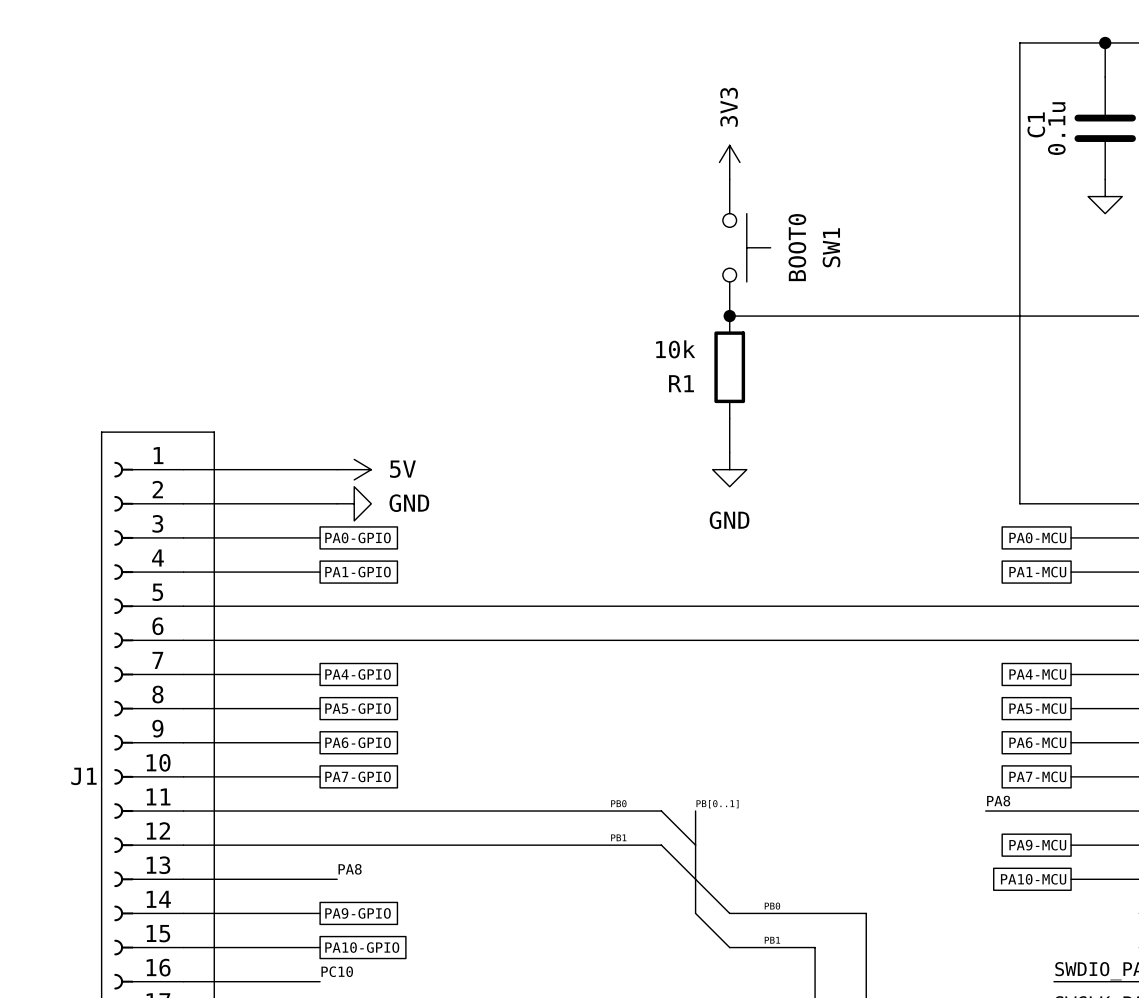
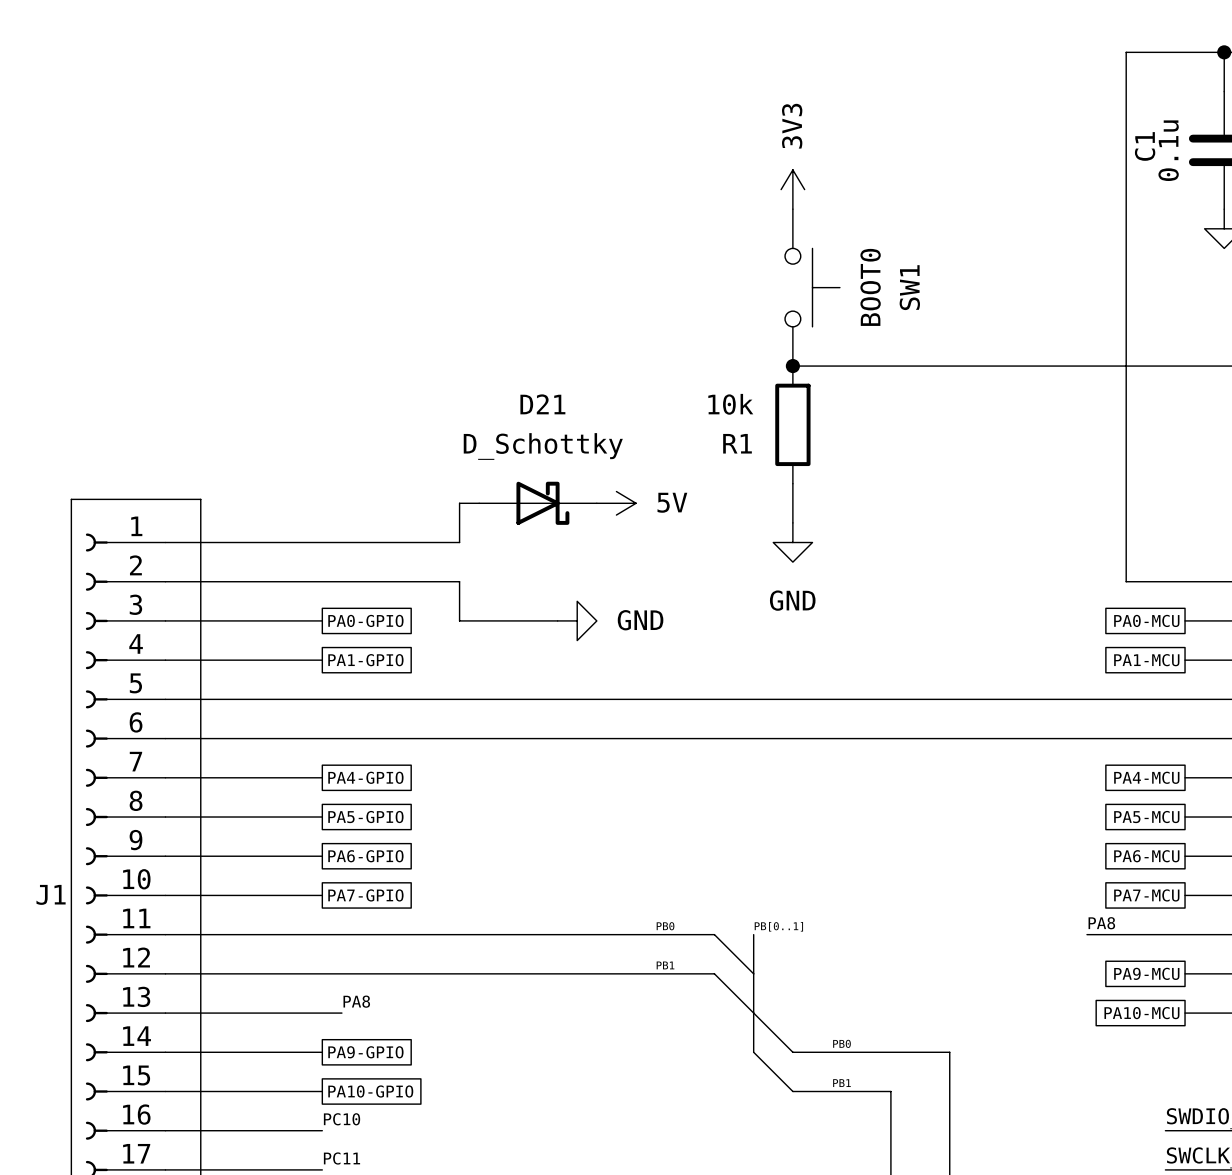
wire: none -> (479, 503) (459, 503) (459, 542) (341, 542)
D21: none -> D_Schottky (538, 503)
power symbol position: 5V (354, 469) -> 5V (616, 503)
wire: none -> (341, 581) (459, 581) (459, 620) (557, 620)
power symbol position: GND (354, 503) -> GND (577, 620)

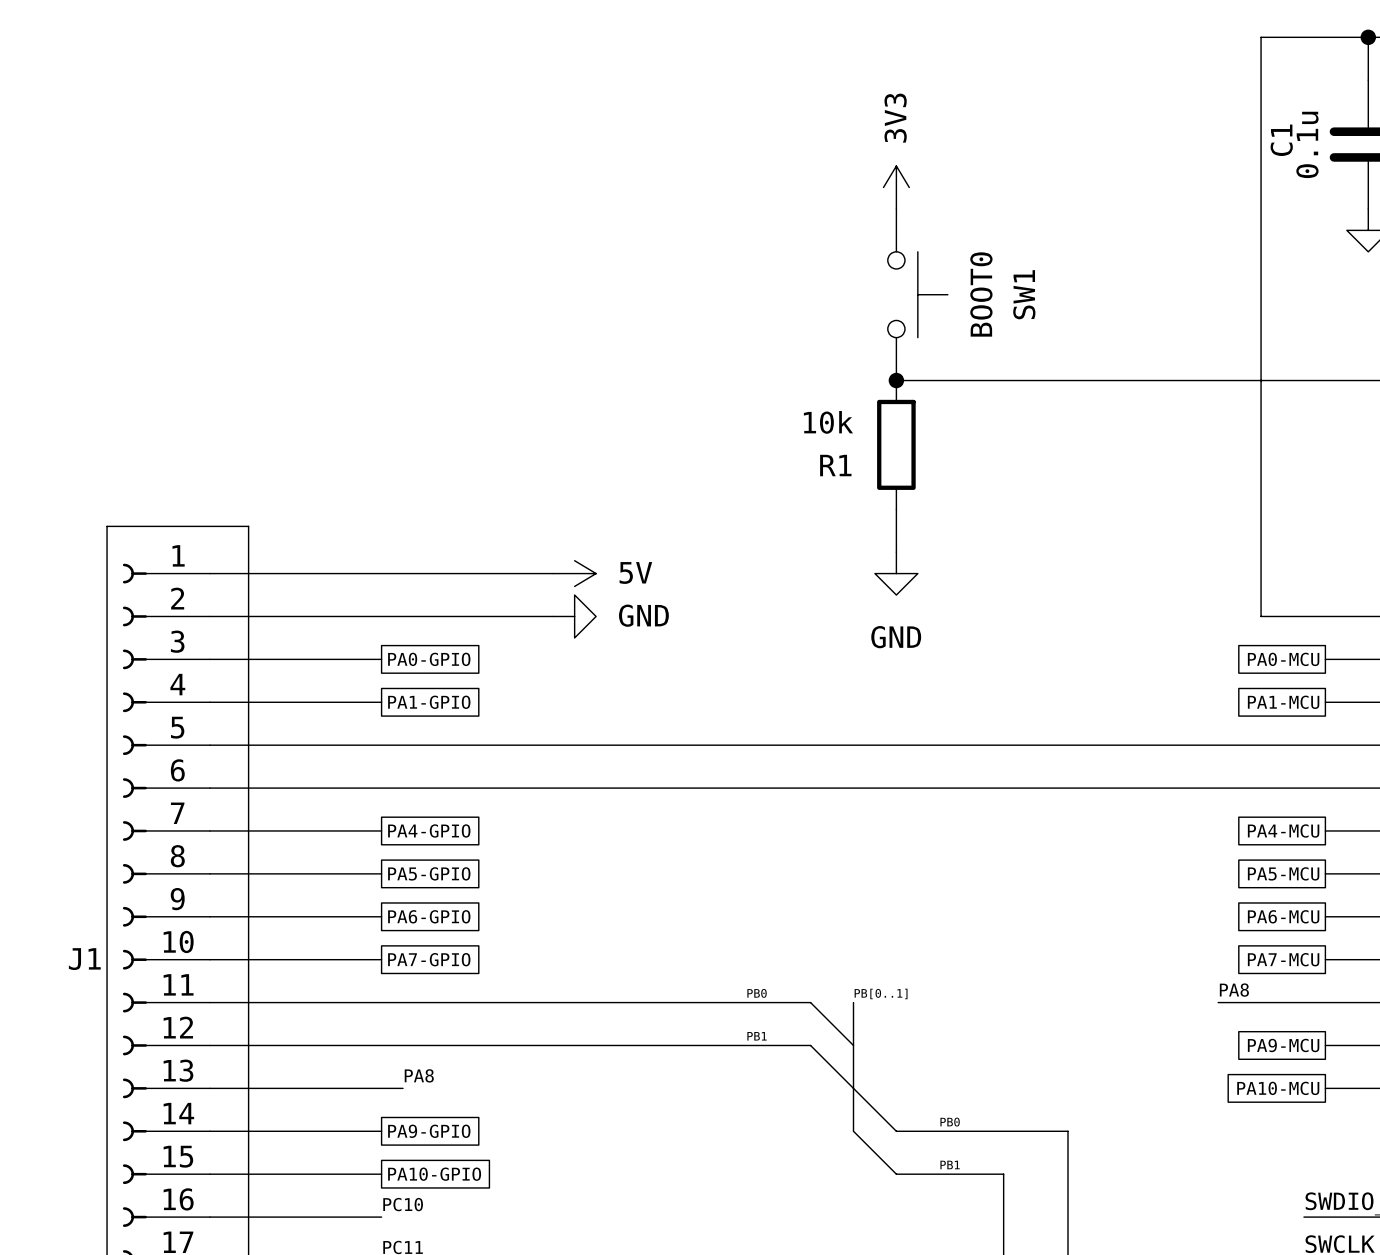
wire: (479, 503) (459, 503) (459, 542) -> (553, 573) (531, 573)
D21: D_Schottky (538, 503) -> none
power symbol position: 5V (616, 503) -> 5V (574, 573)
wire: (459, 581) (459, 620) (557, 620) -> (531, 616) (553, 616)
power symbol position: GND (577, 620) -> GND (574, 616)

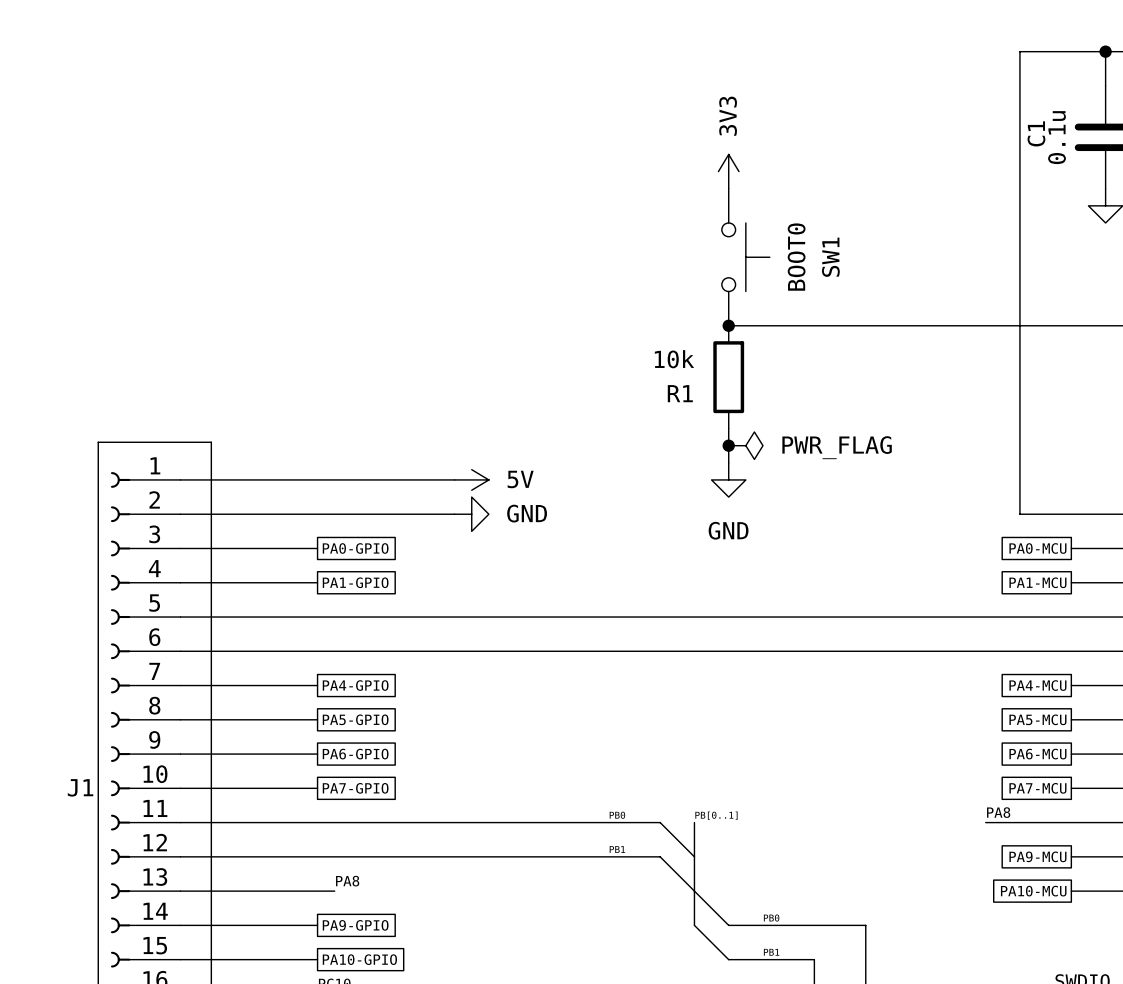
junction: none -> (728, 445)
power symbol: none -> PWR_FLAG (745, 445)

